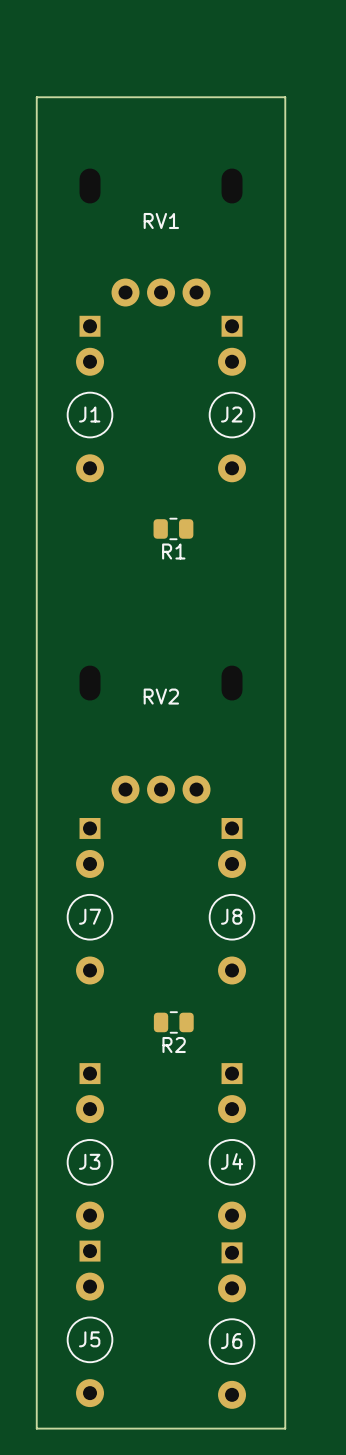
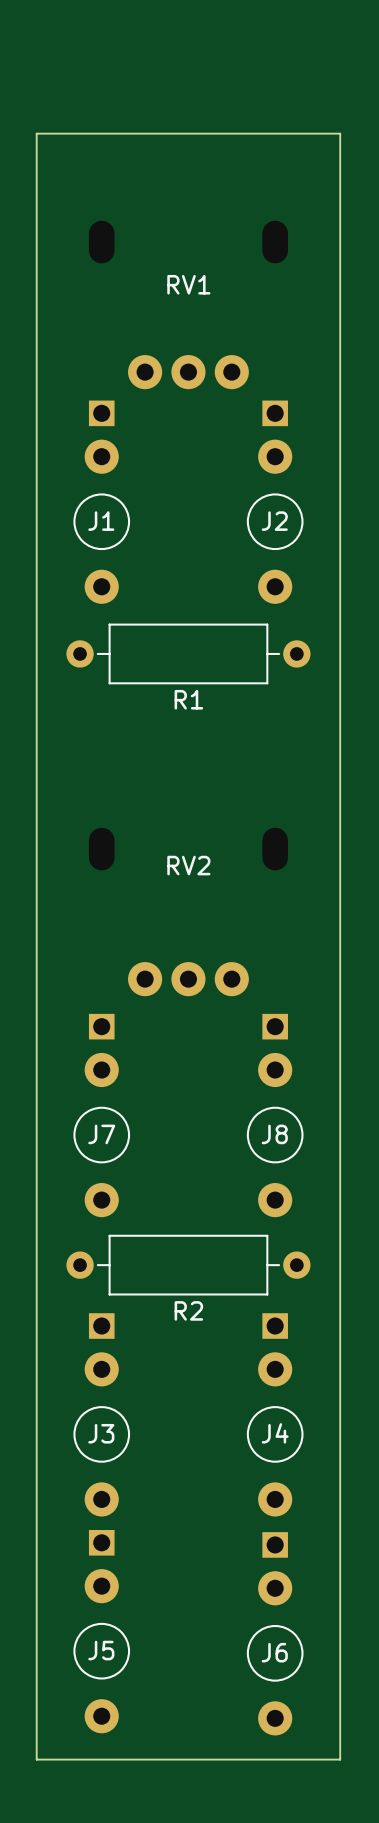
R1 footprint: [153, 517, 194, 541] -> [66, 623, 311, 685]
R2 footprint: [153, 1011, 194, 1034] -> [66, 1234, 311, 1296]

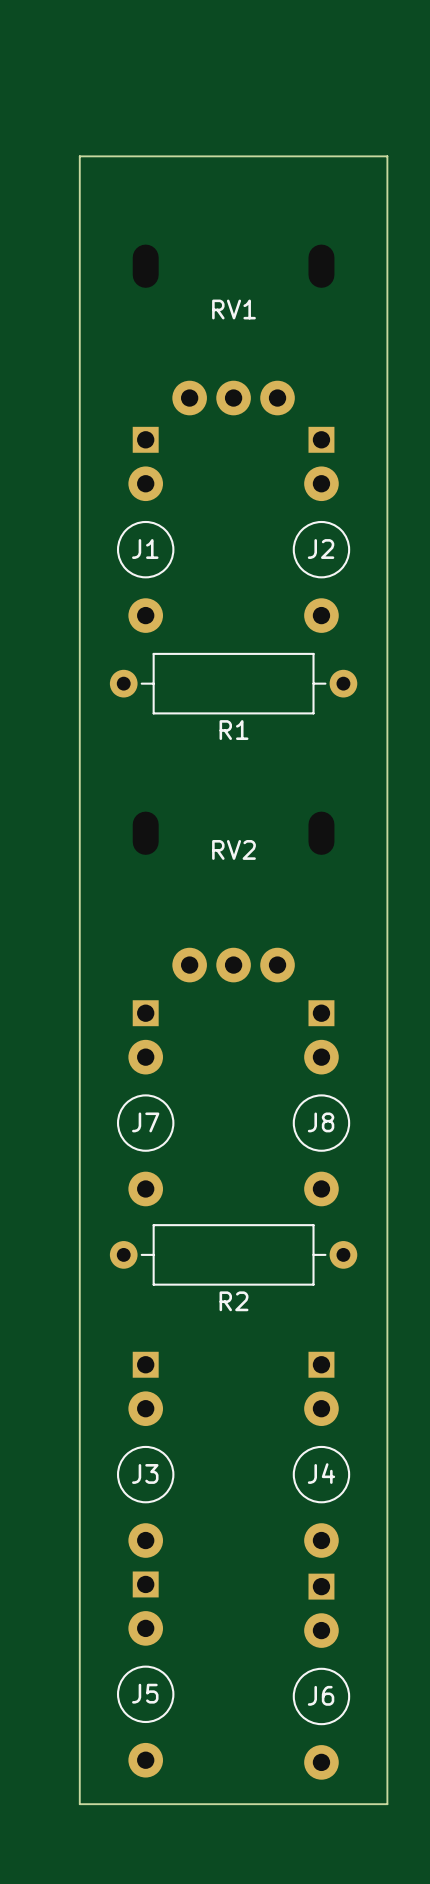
RV2 position: (188, 911) -> (233, 896)
J7 position: (101, 1115) -> (145, 1103)
J8 position: (275, 1115) -> (321, 1103)
R2 position: (188, 1265) -> (233, 1254)

